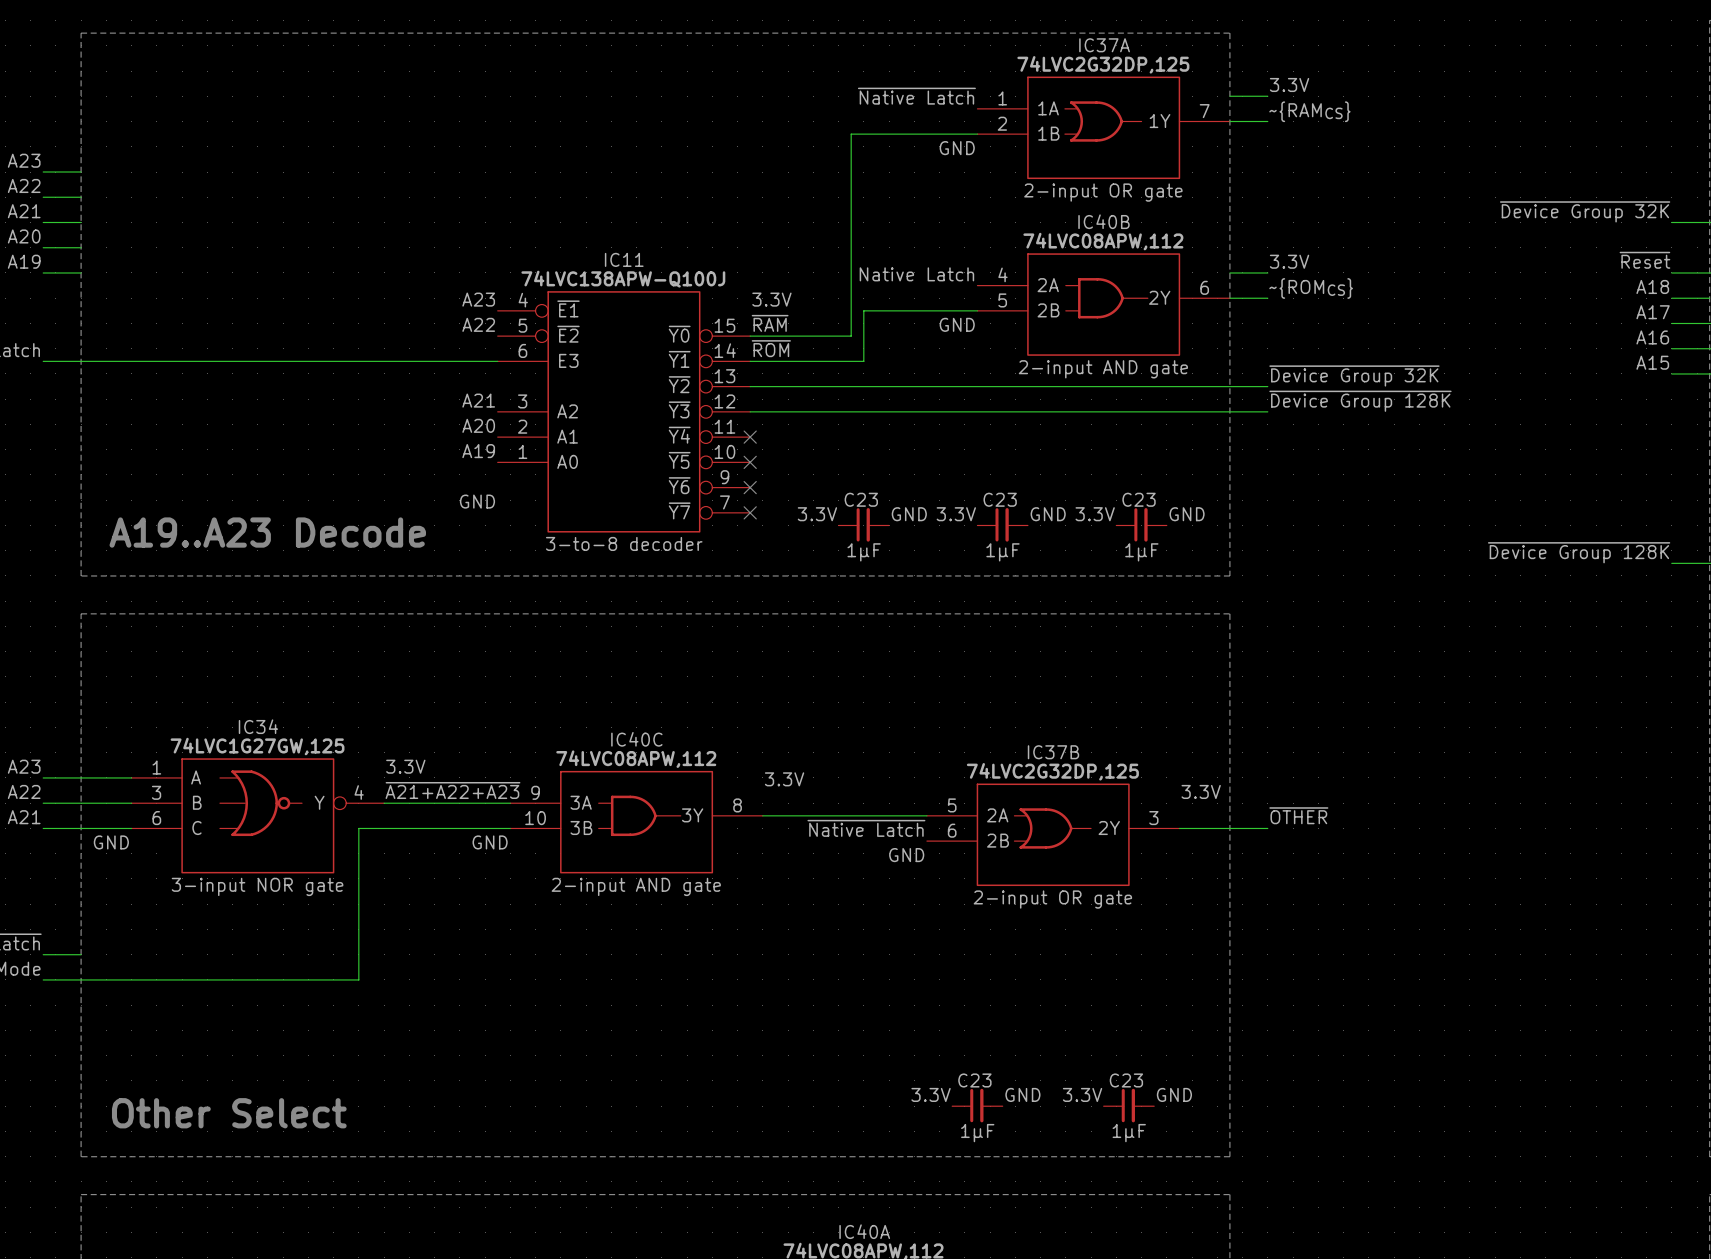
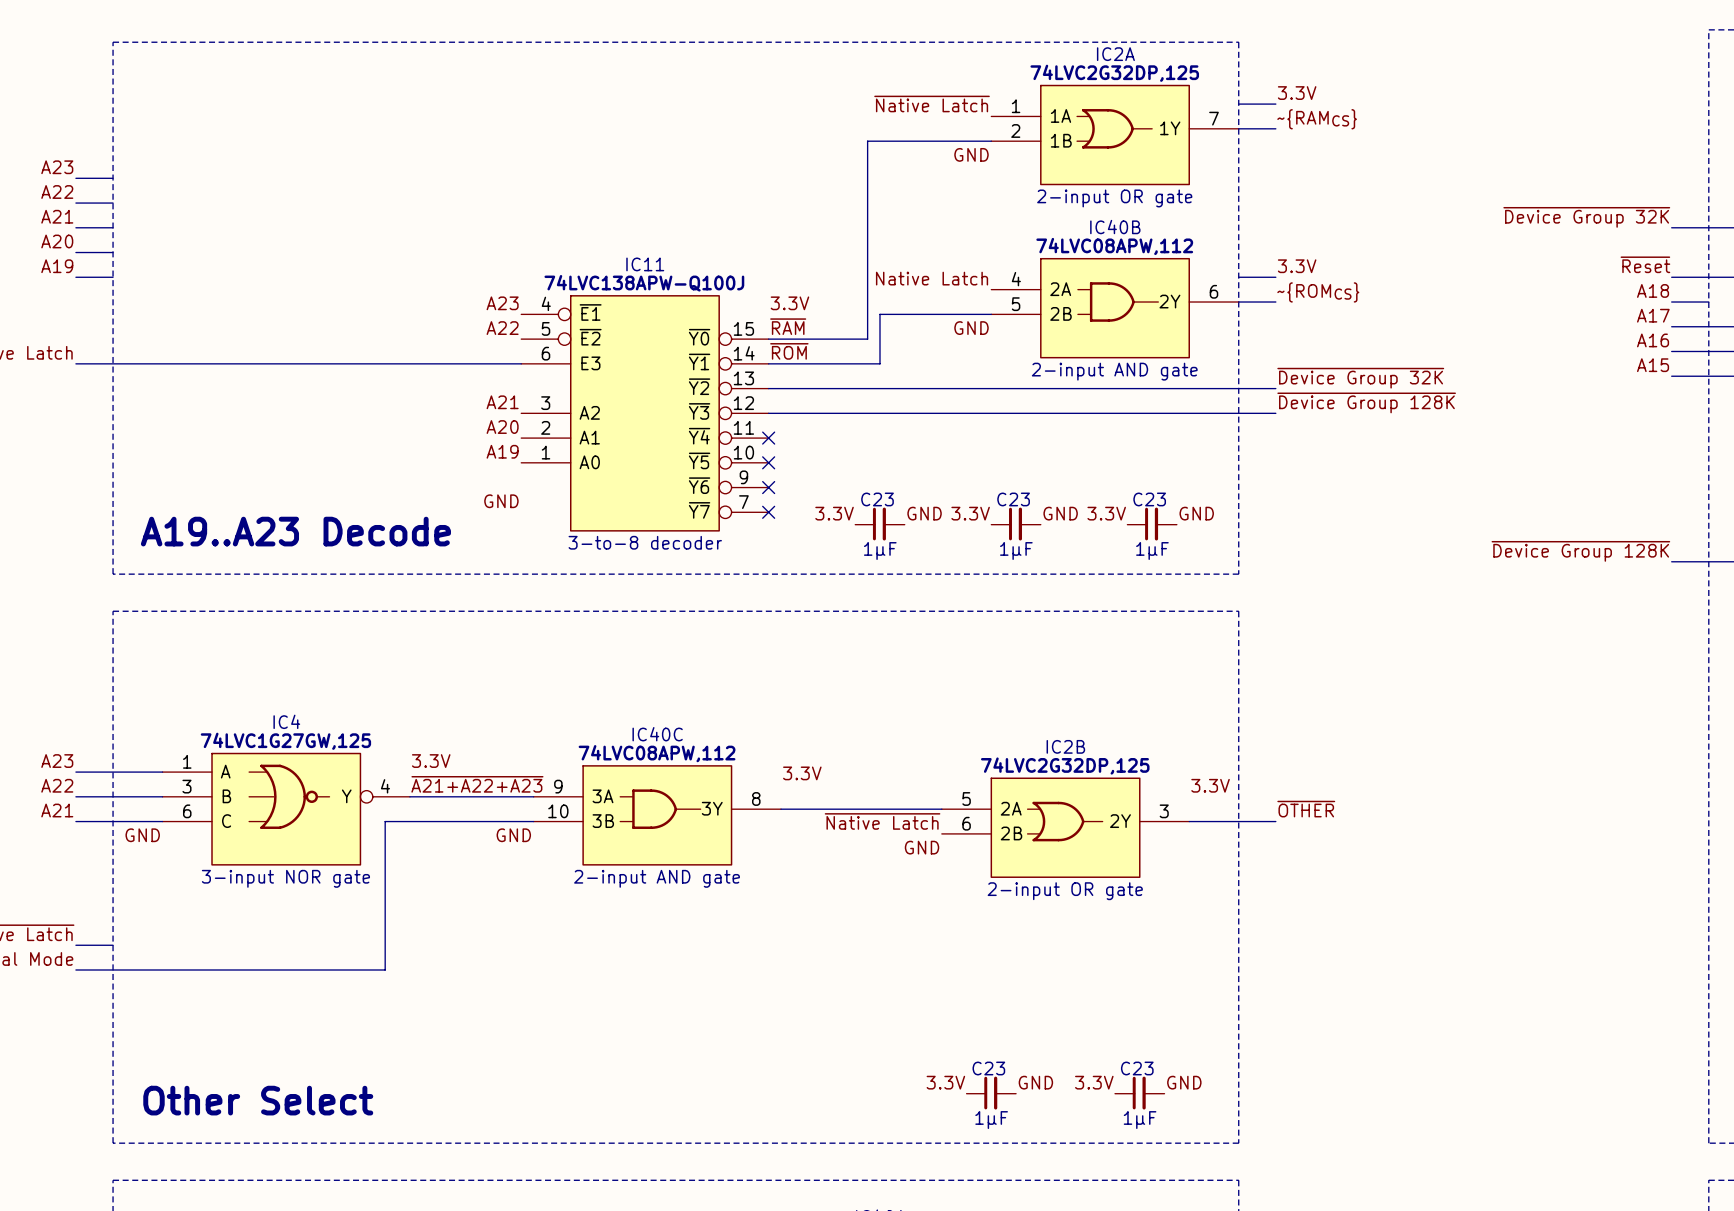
IC37A name: IC37A (1104, 45) -> IC2A (1115, 54)
IC34 name: IC34 (258, 726) -> IC4 (286, 721)
IC37B name: IC37B (1053, 752) -> IC2B (1065, 746)

